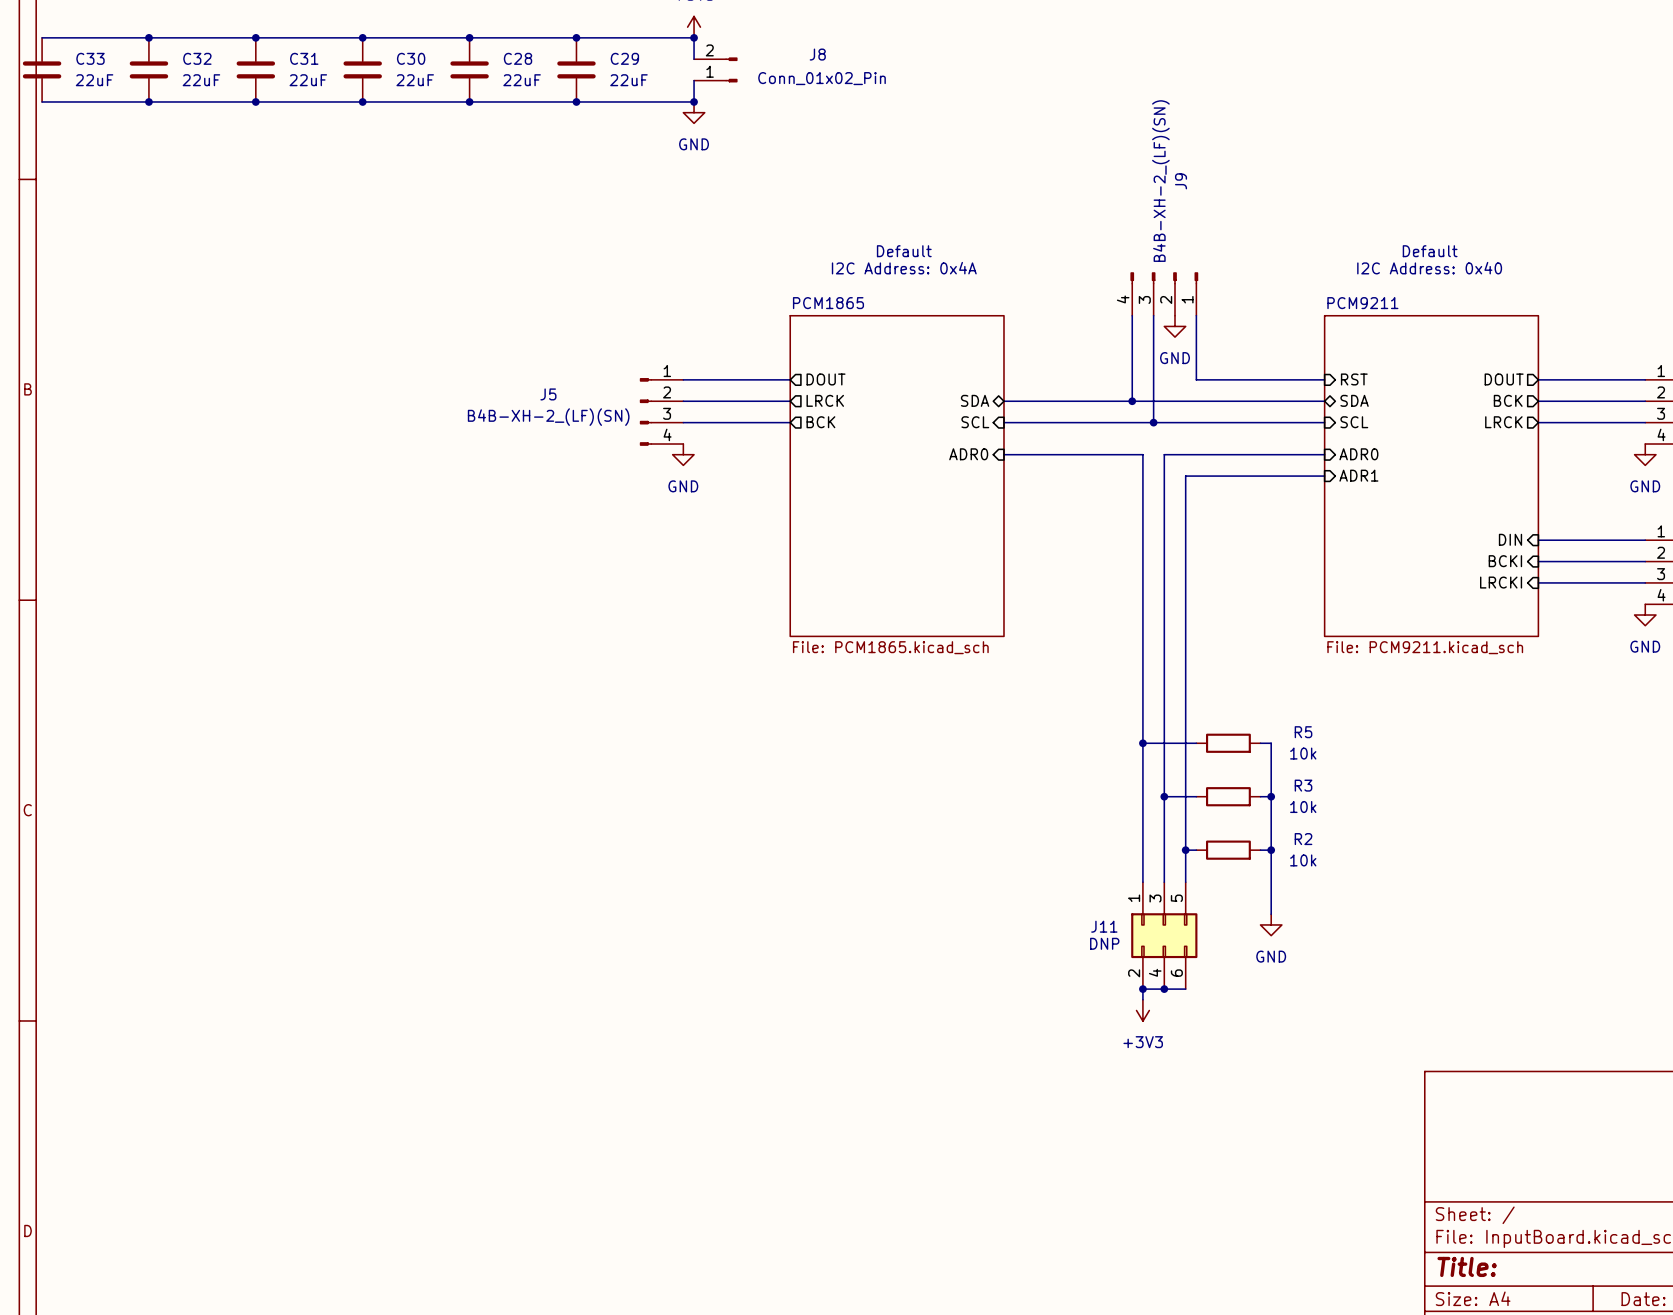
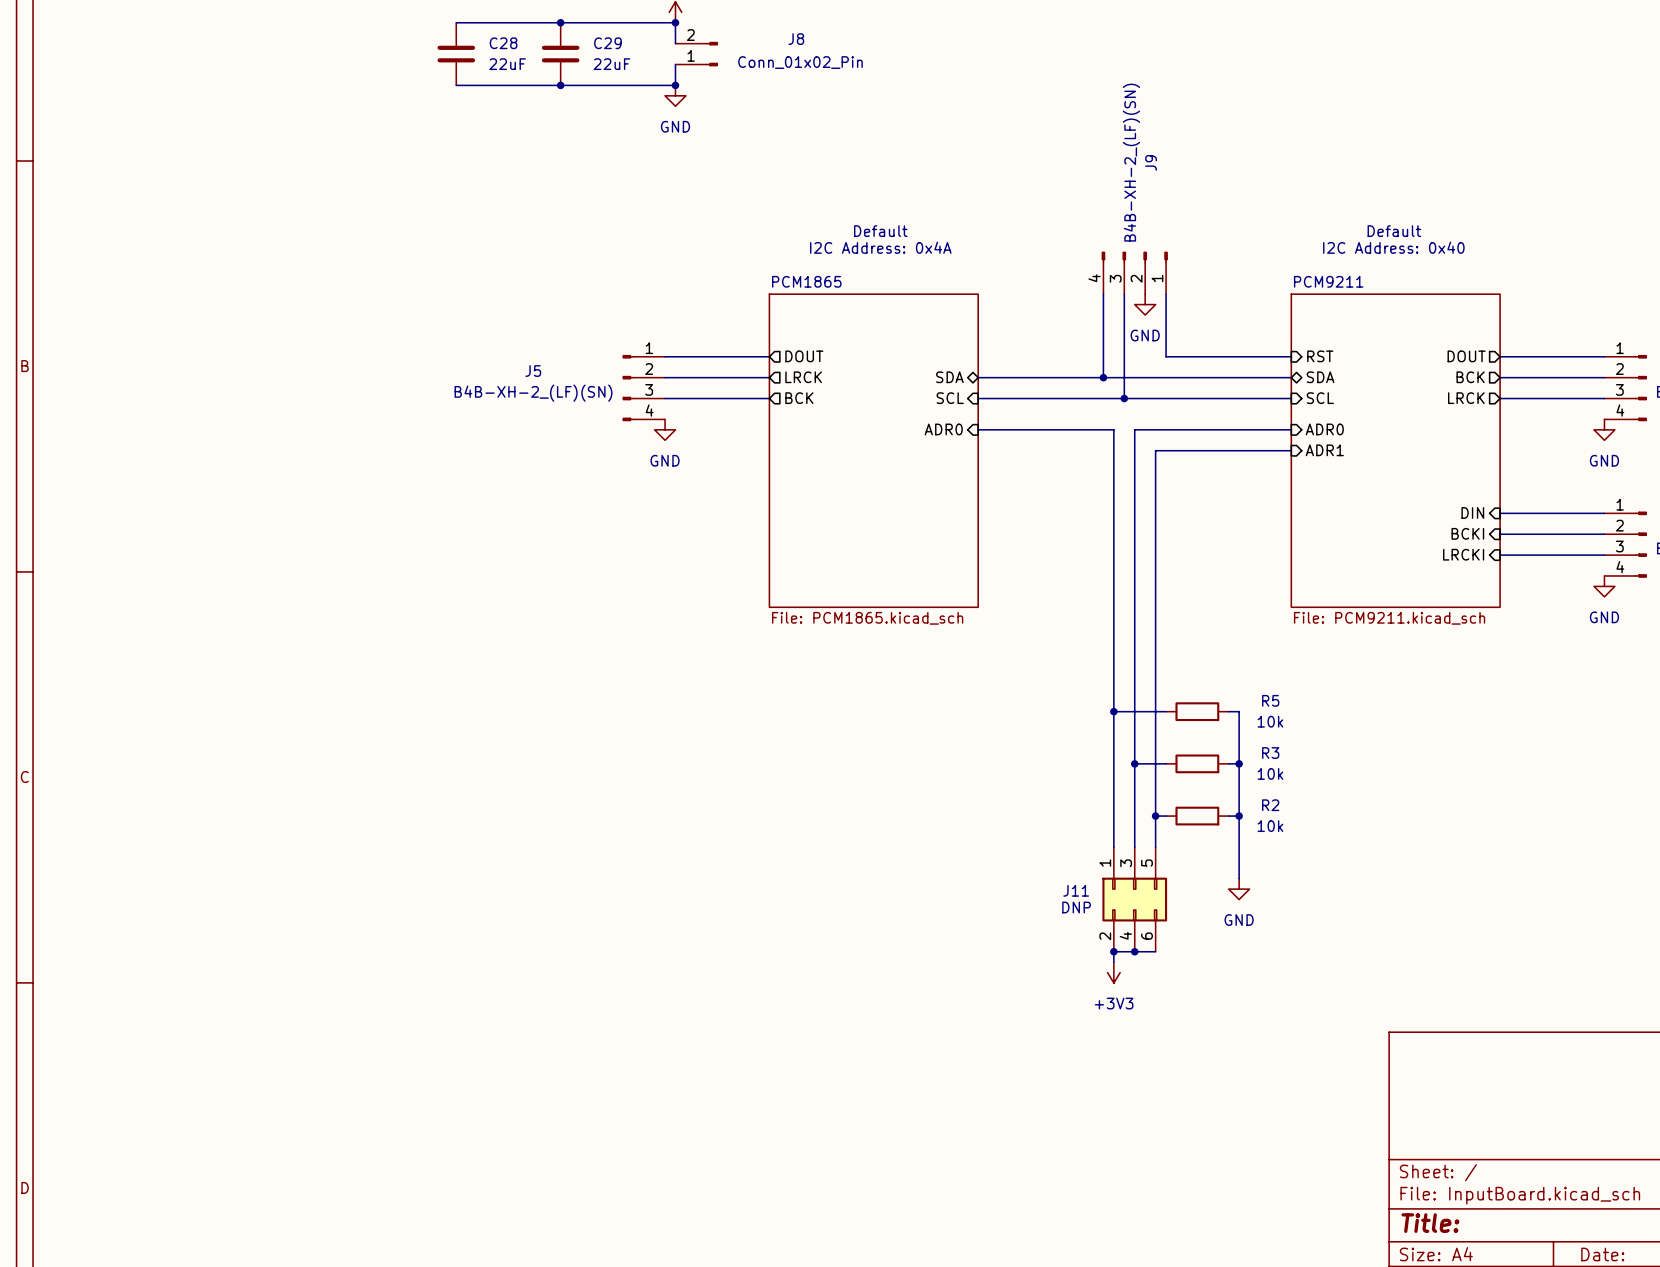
wire: (42, 37) (469, 37) -> none
junction: (148, 37) -> none
junction: (255, 37) -> none
junction: (362, 37) -> none
junction: (469, 37) -> none
C33: 22uF (42, 69) -> none
C32: 22uF (148, 69) -> none
C31: 22uF (255, 69) -> none
C30: 22uF (362, 69) -> none
wire: (42, 101) (469, 101) -> none
junction: (148, 101) -> none
junction: (255, 101) -> none
junction: (362, 101) -> none
junction: (469, 101) -> none

